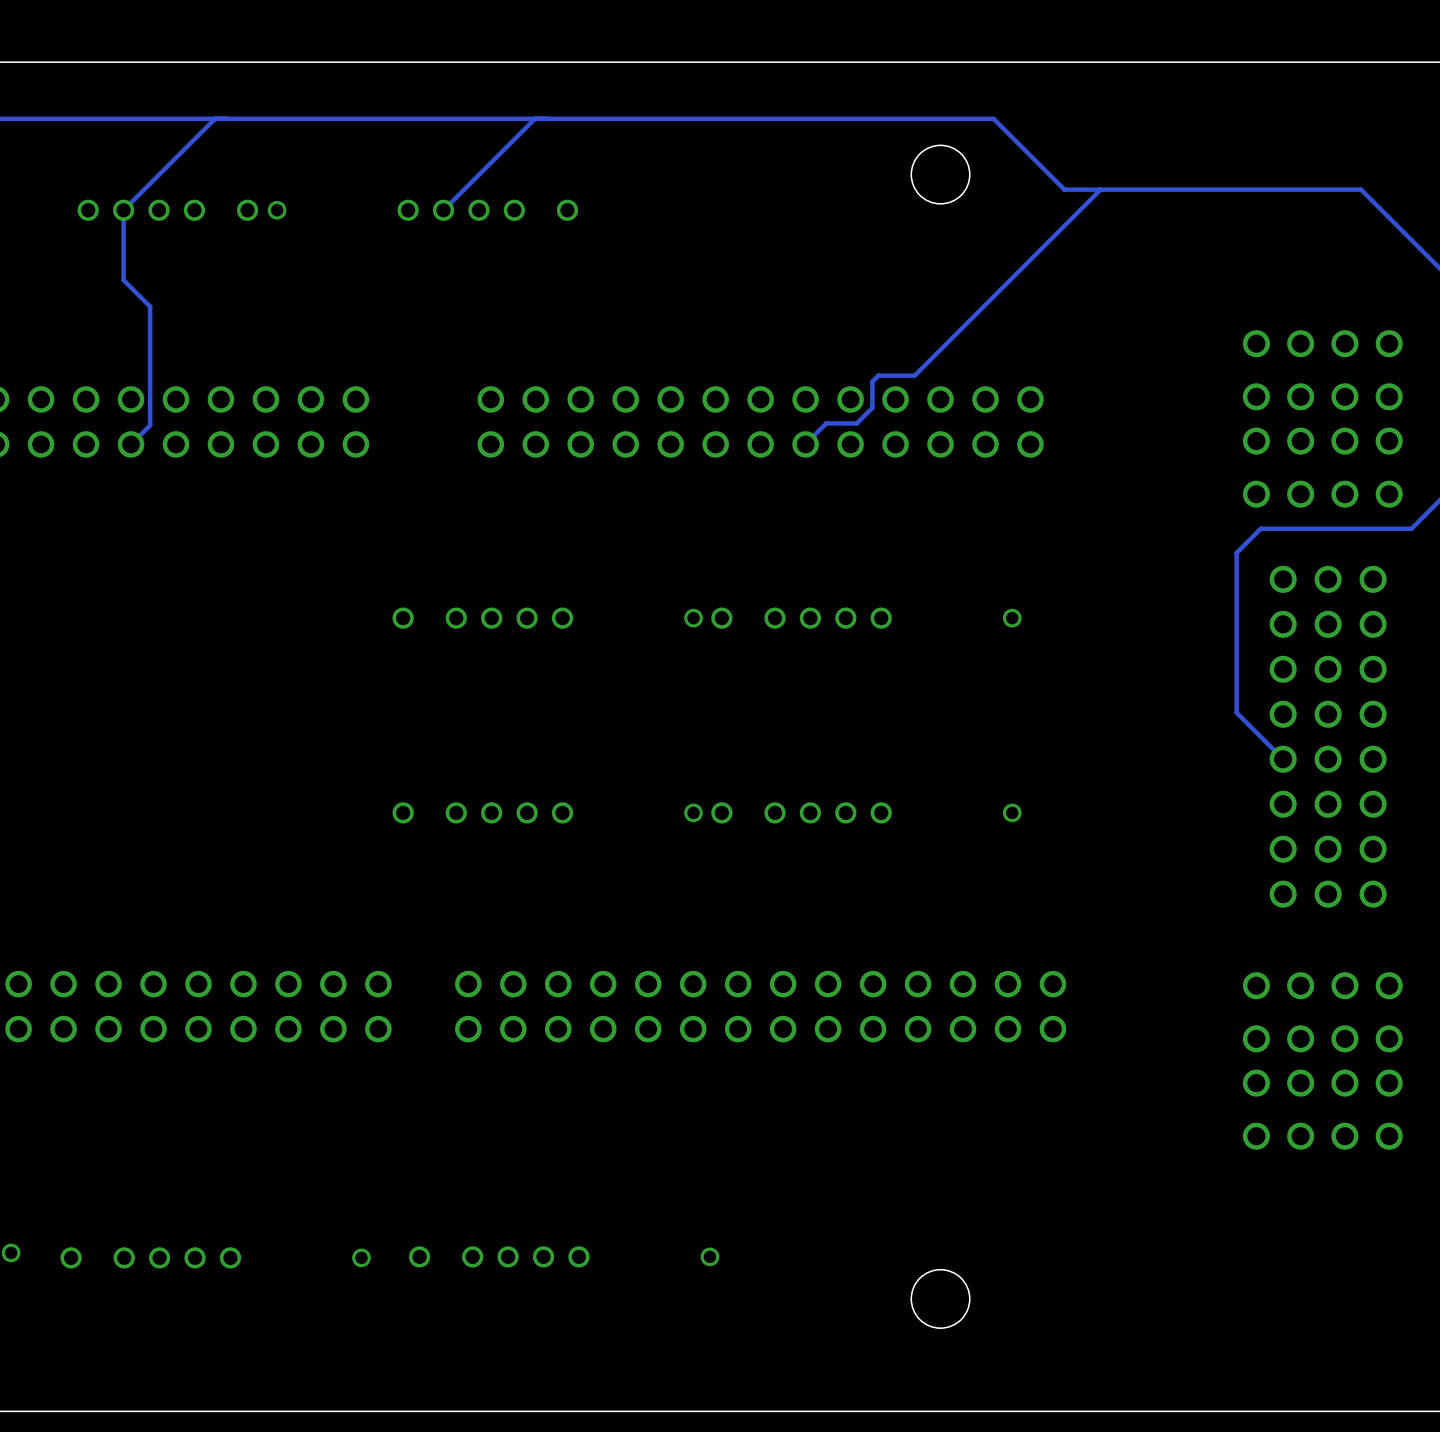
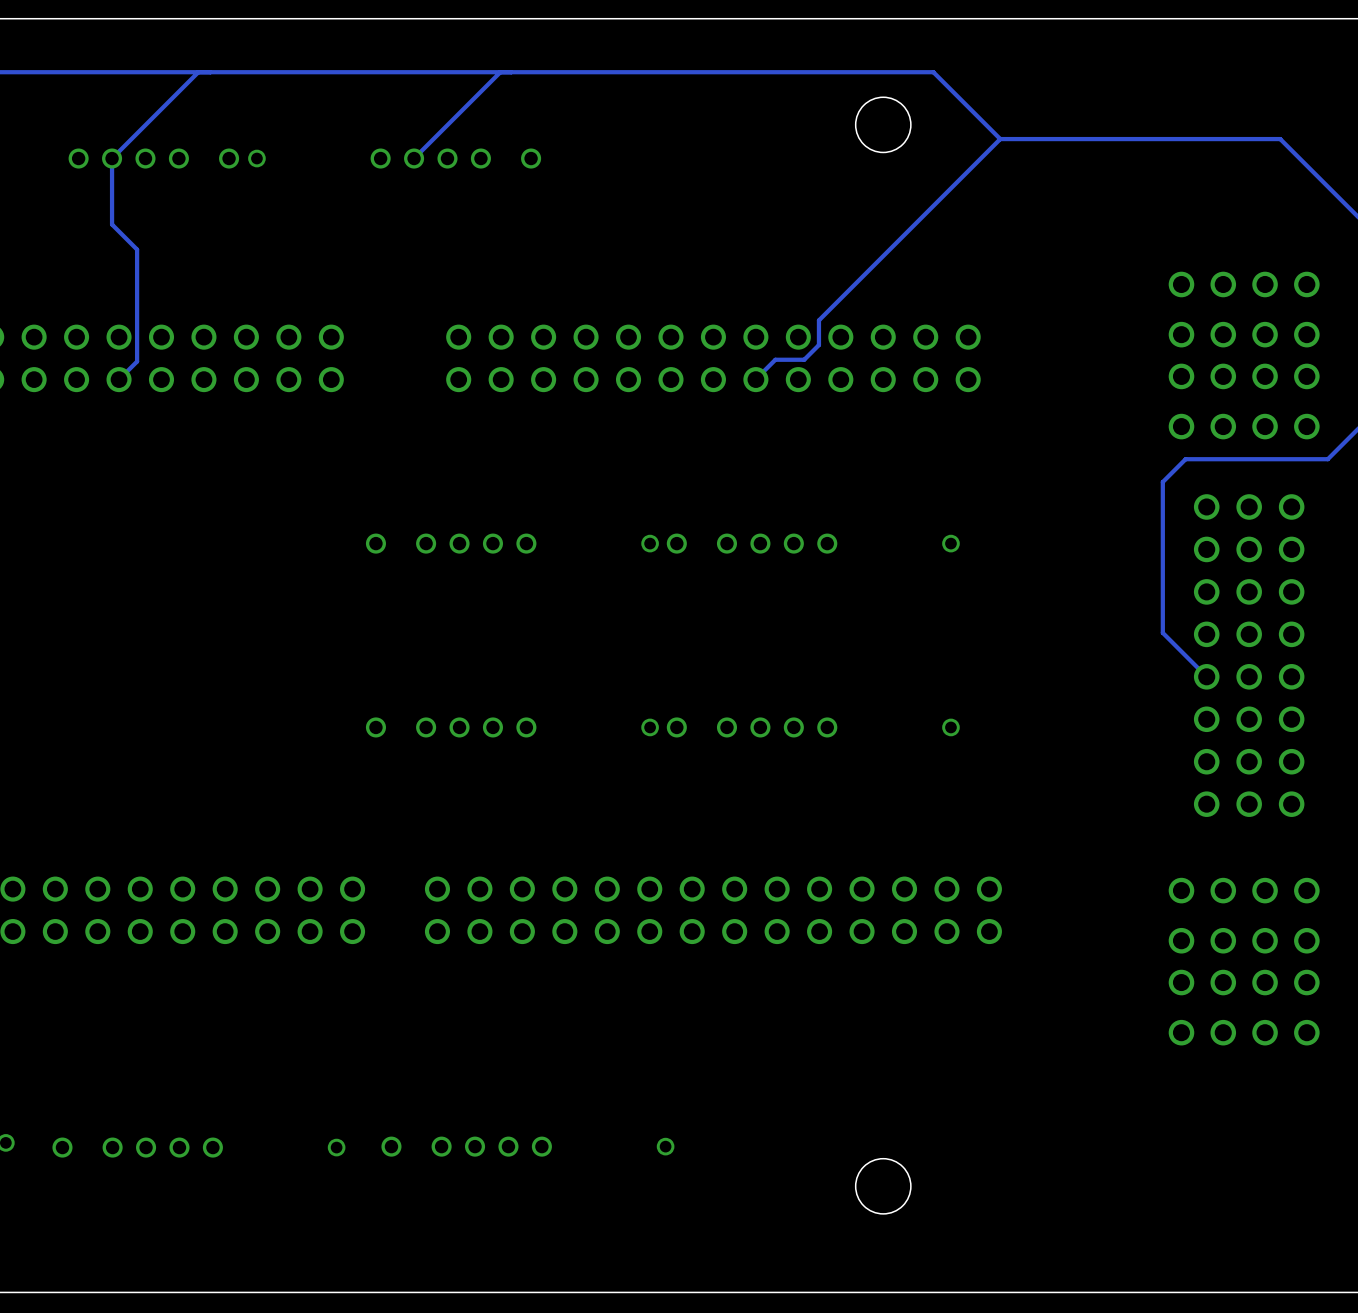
track: (1100, 189) (914, 375) (878, 375) -> (1000, 139) (824, 314)

